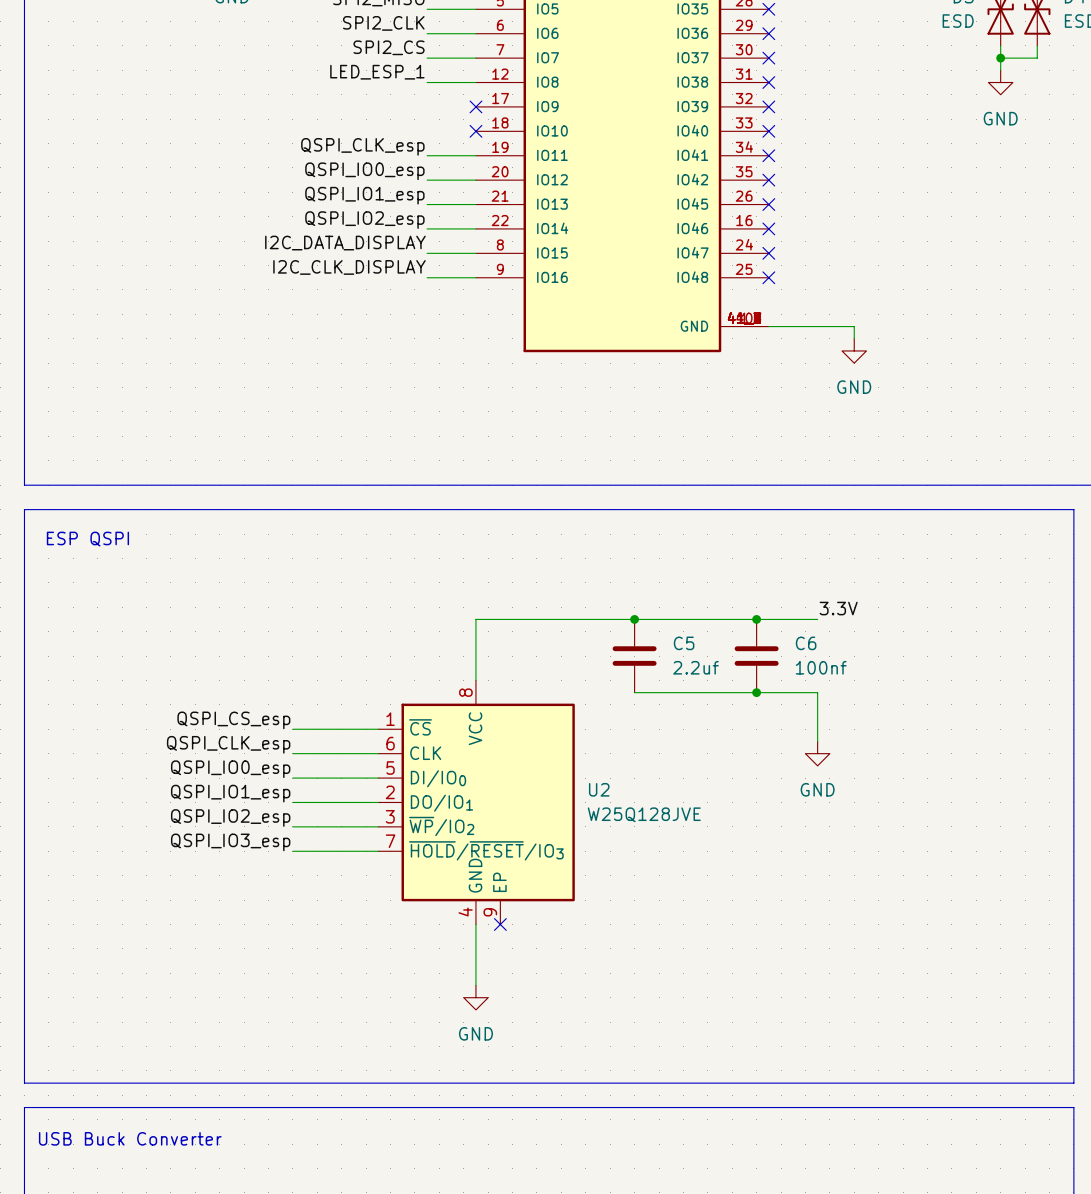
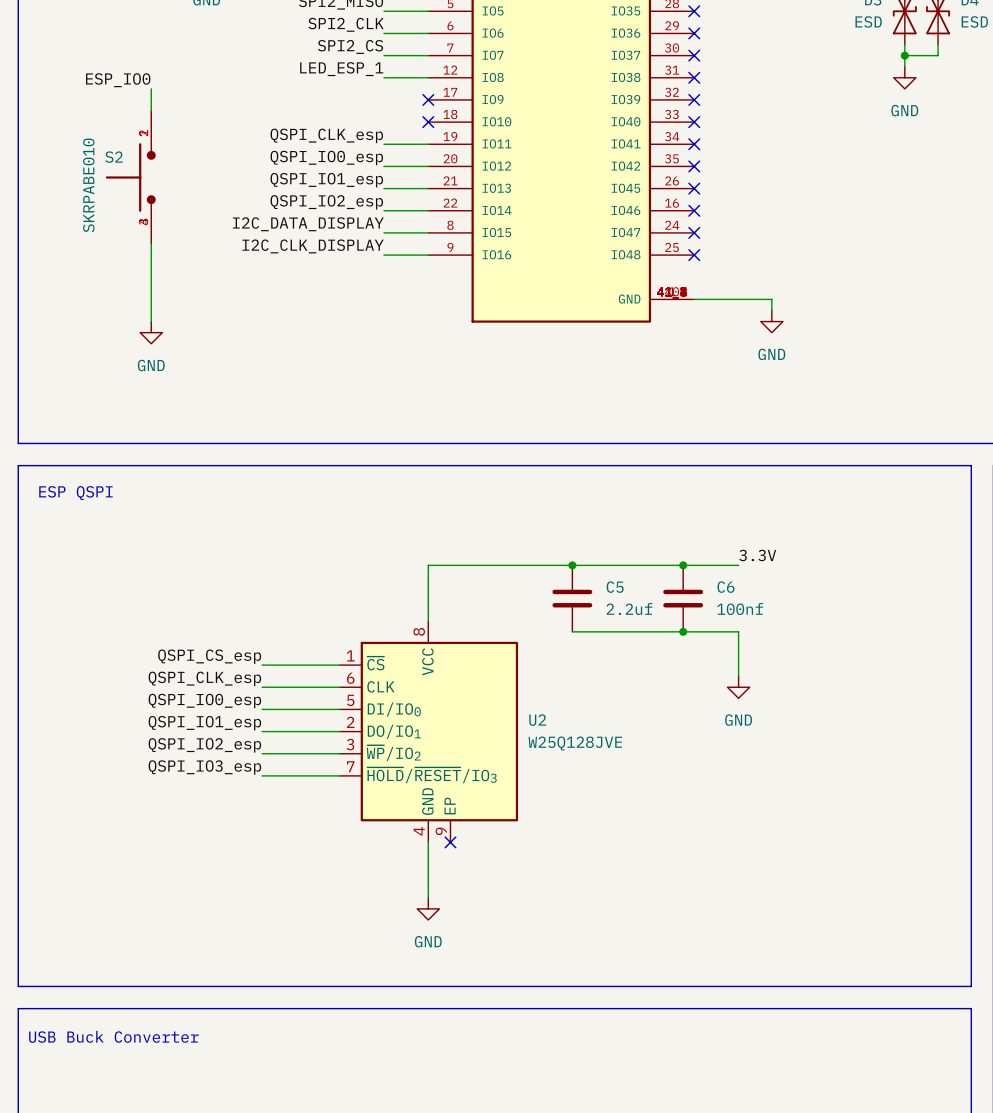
label: none -> ESP_IO0 (118, 80)
wire: none -> (151, 88) (151, 111)
S2: none -> SKRPABE010 (130, 177)
wire: none -> (151, 244) (151, 321)
power symbol: none -> GND (151, 332)

